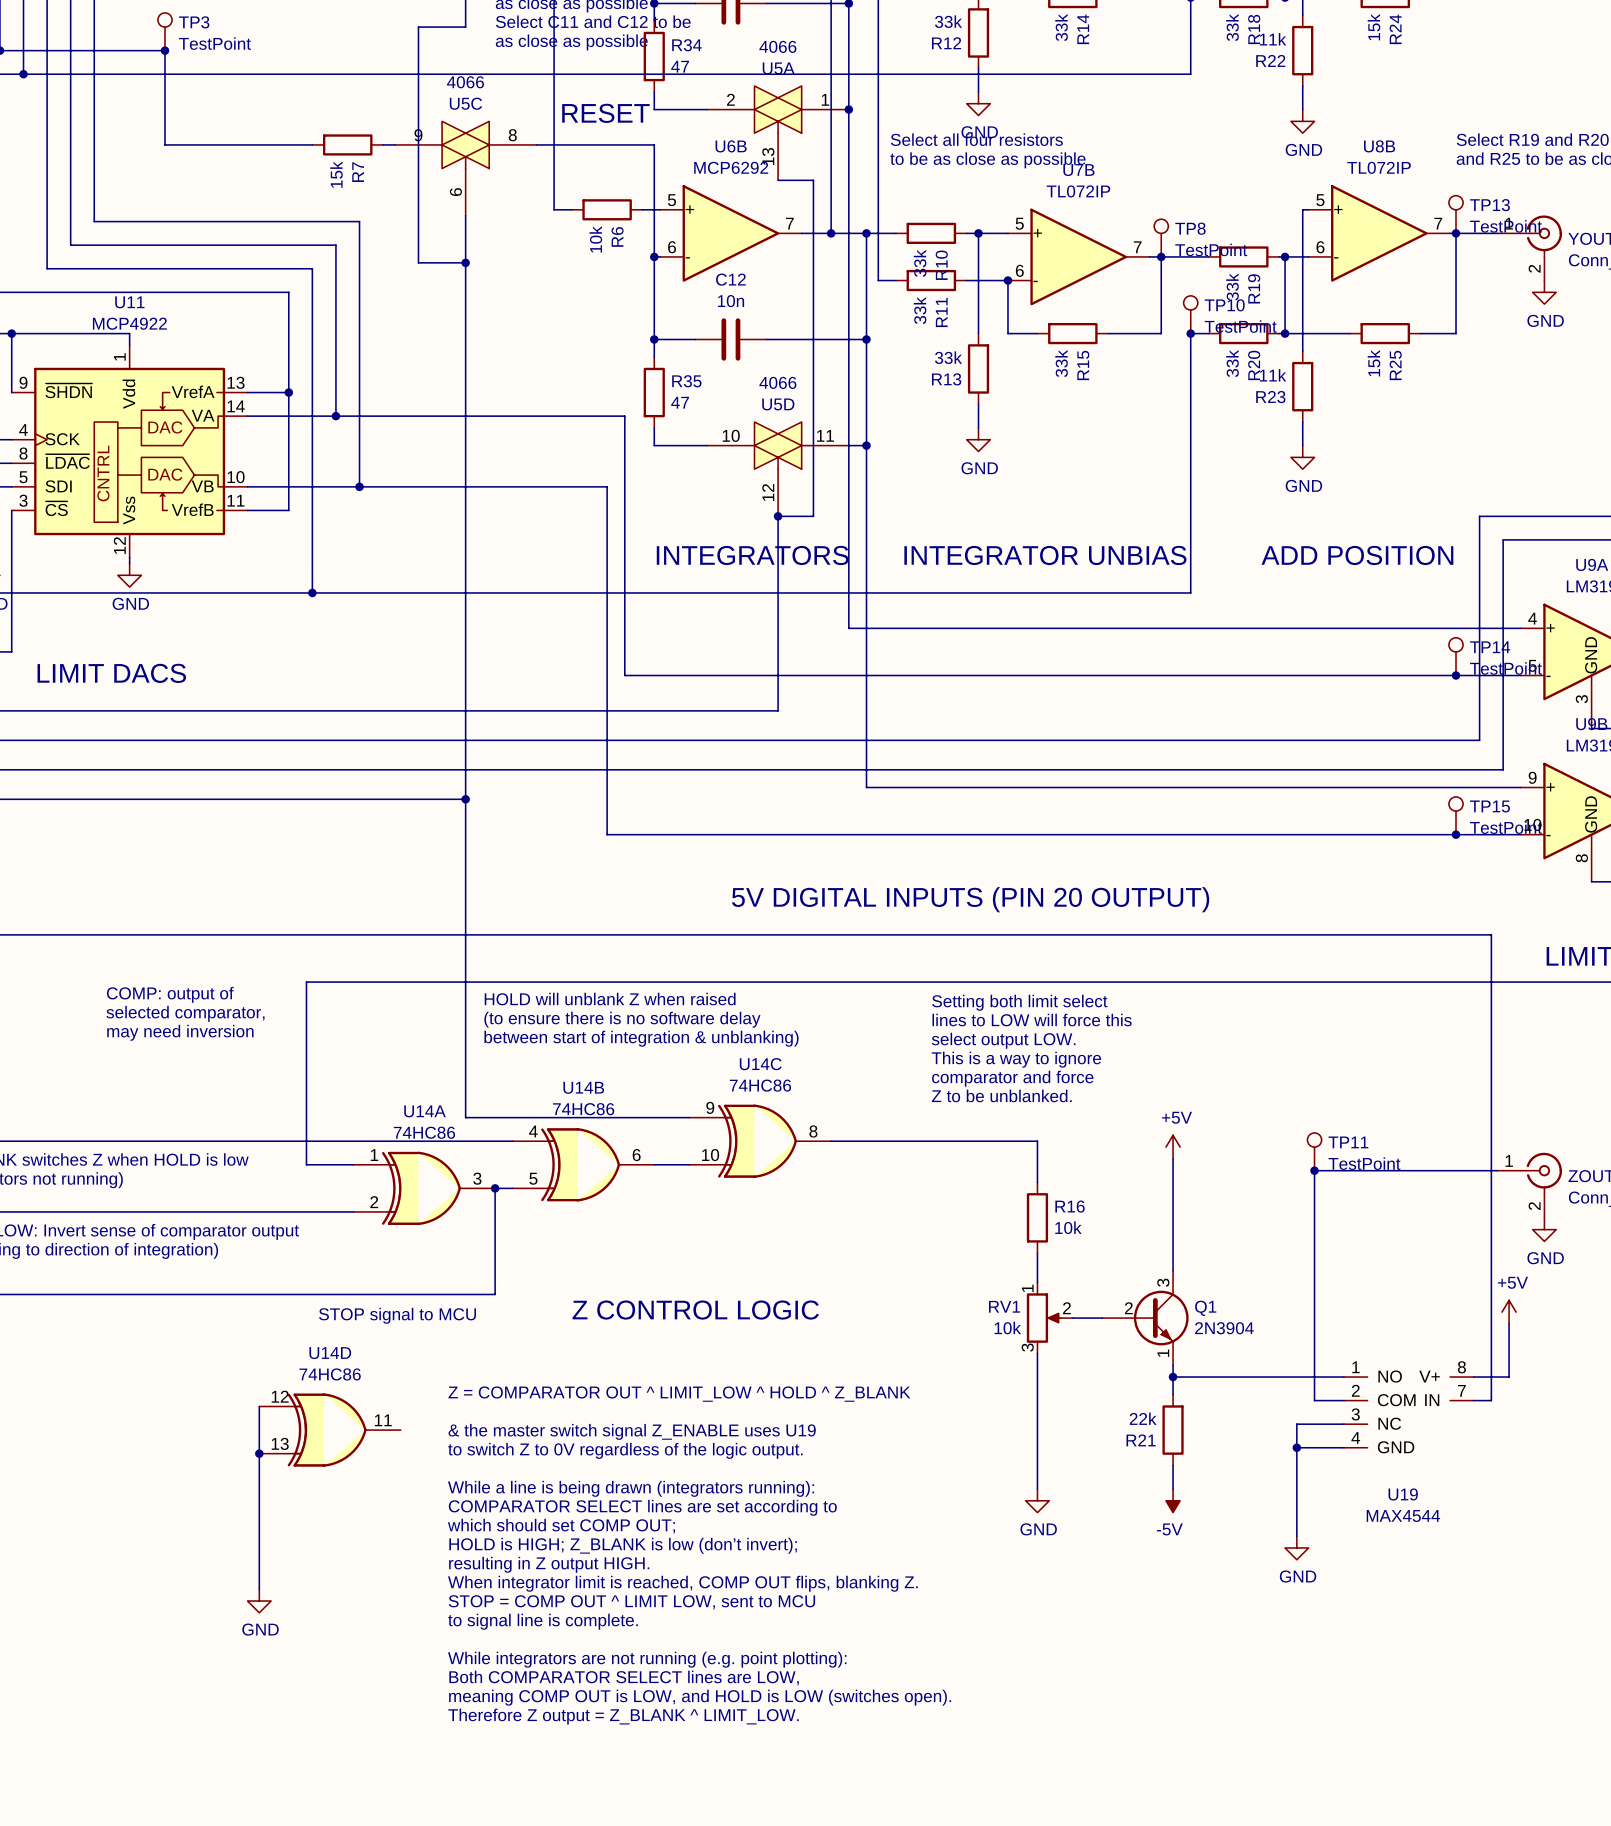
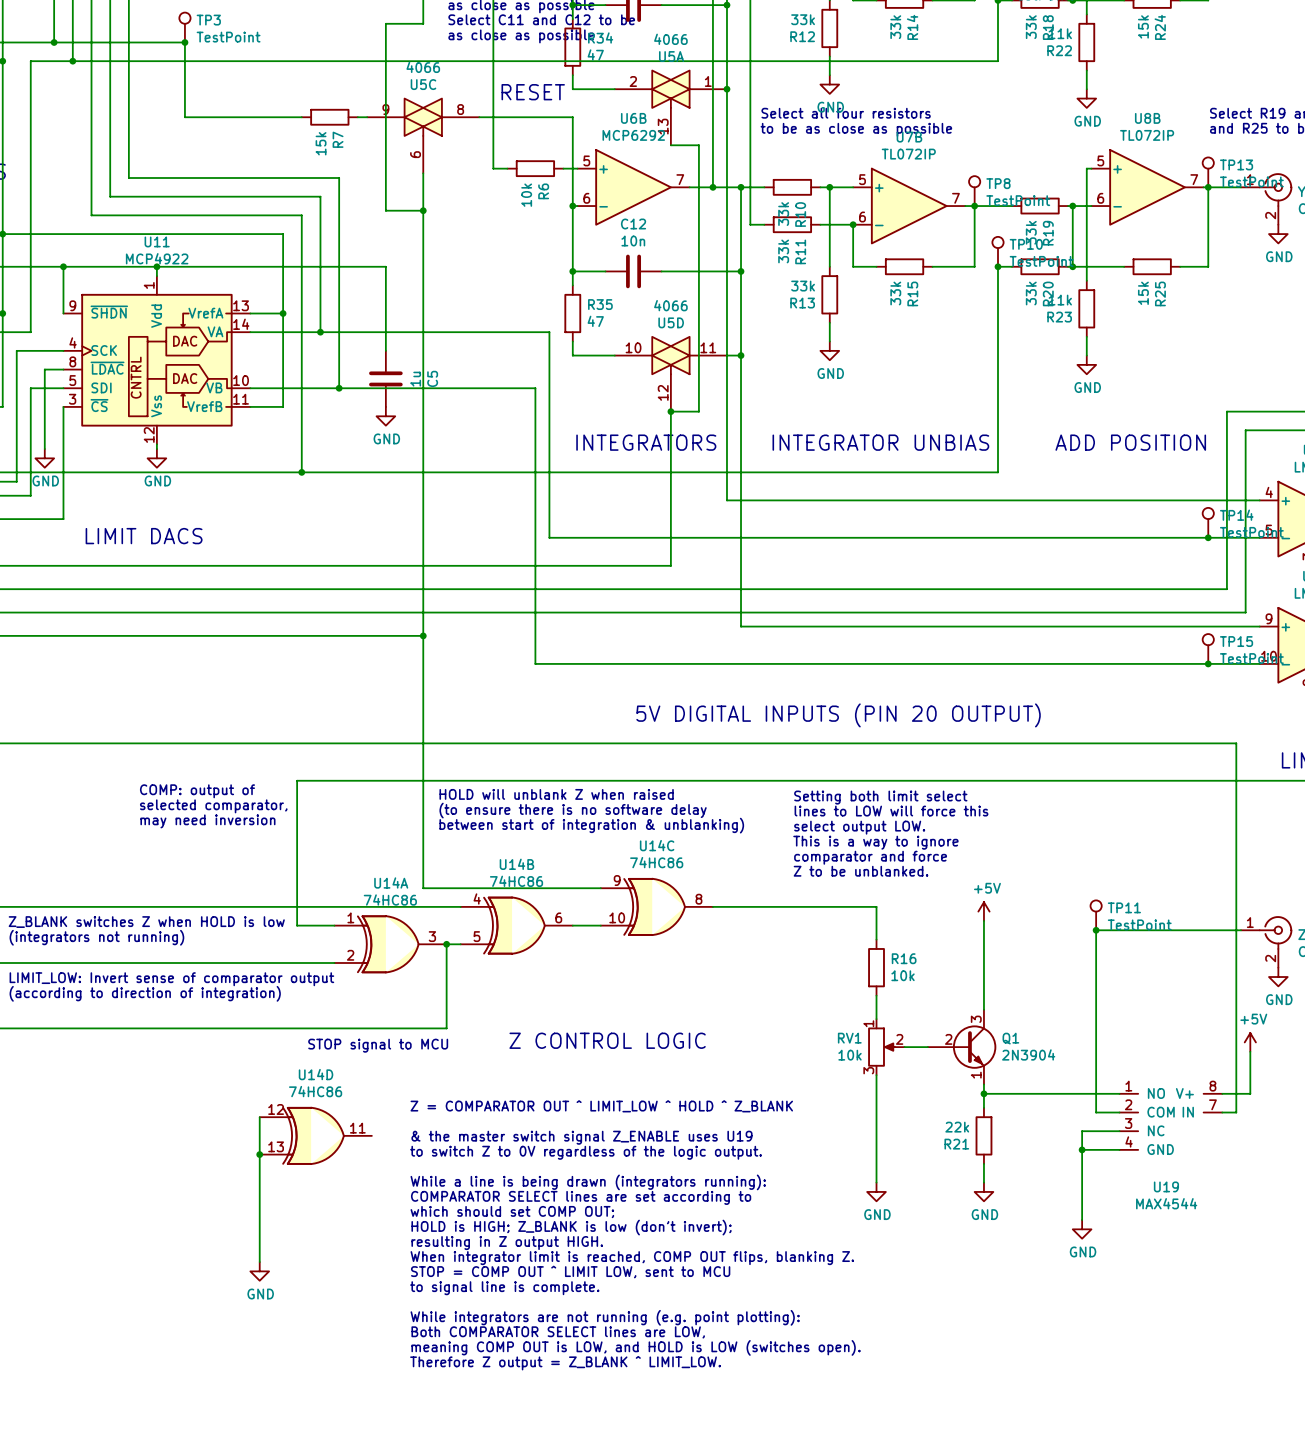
wire: none -> (156, 266) (385, 266) (385, 350)
junction: none -> (156, 266)
C5: none -> 1u (385, 378)
power symbol: none -> GND (385, 416)
power symbol: -5V (1173, 1500) -> GND (983, 1191)

